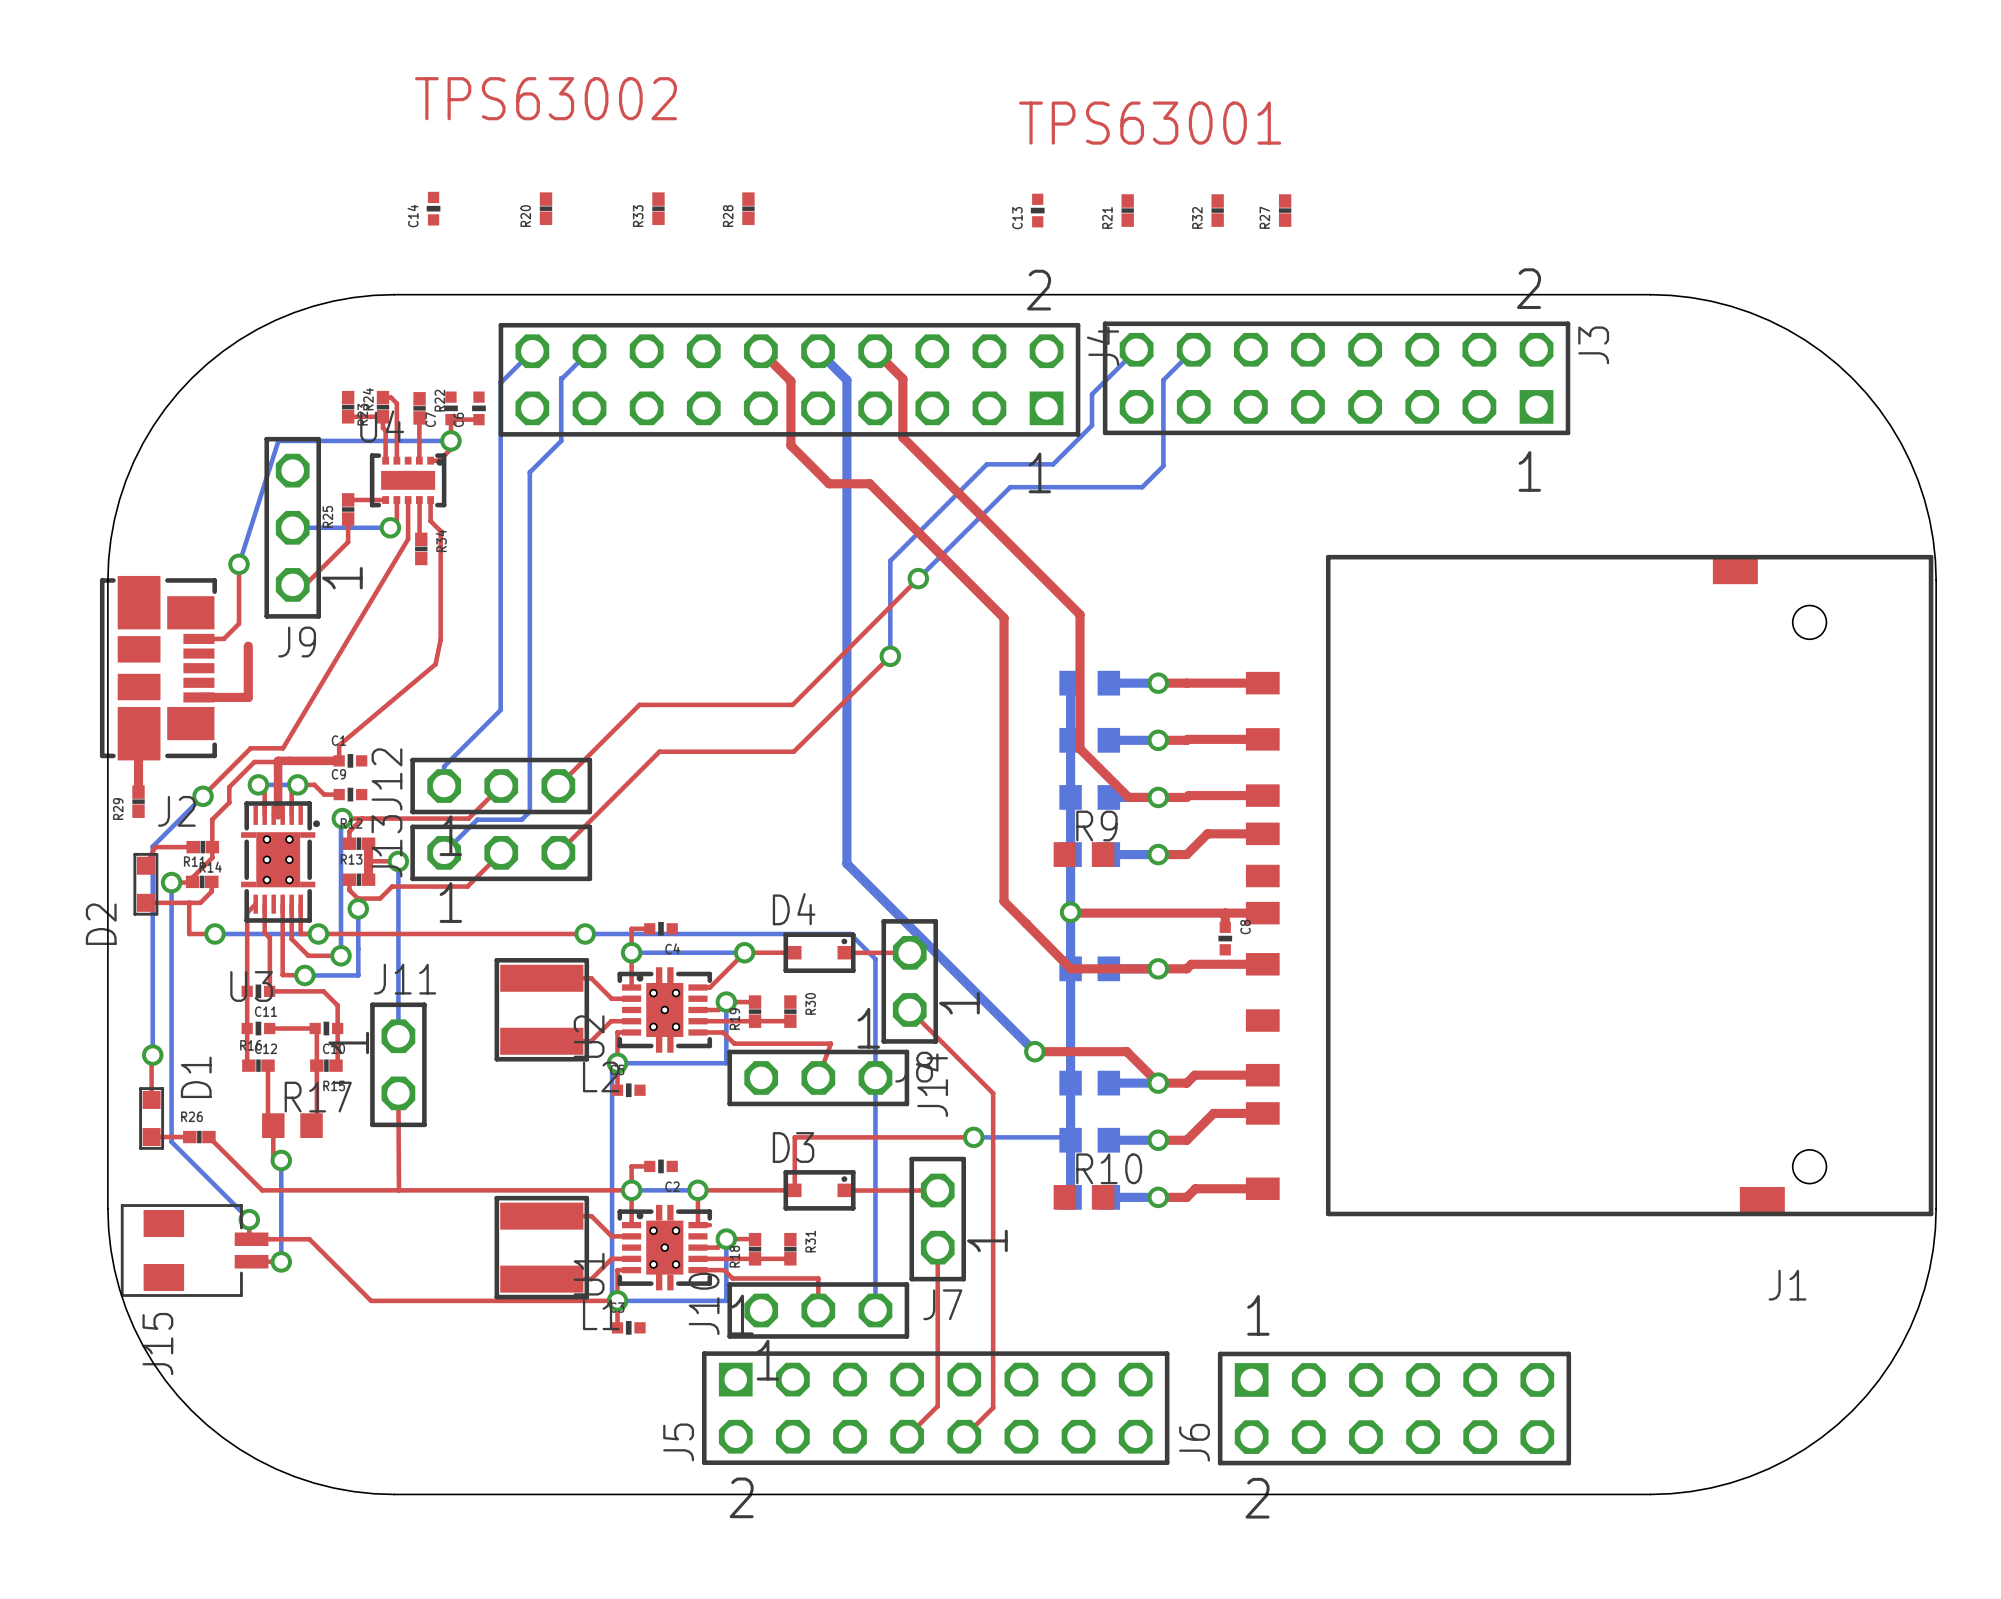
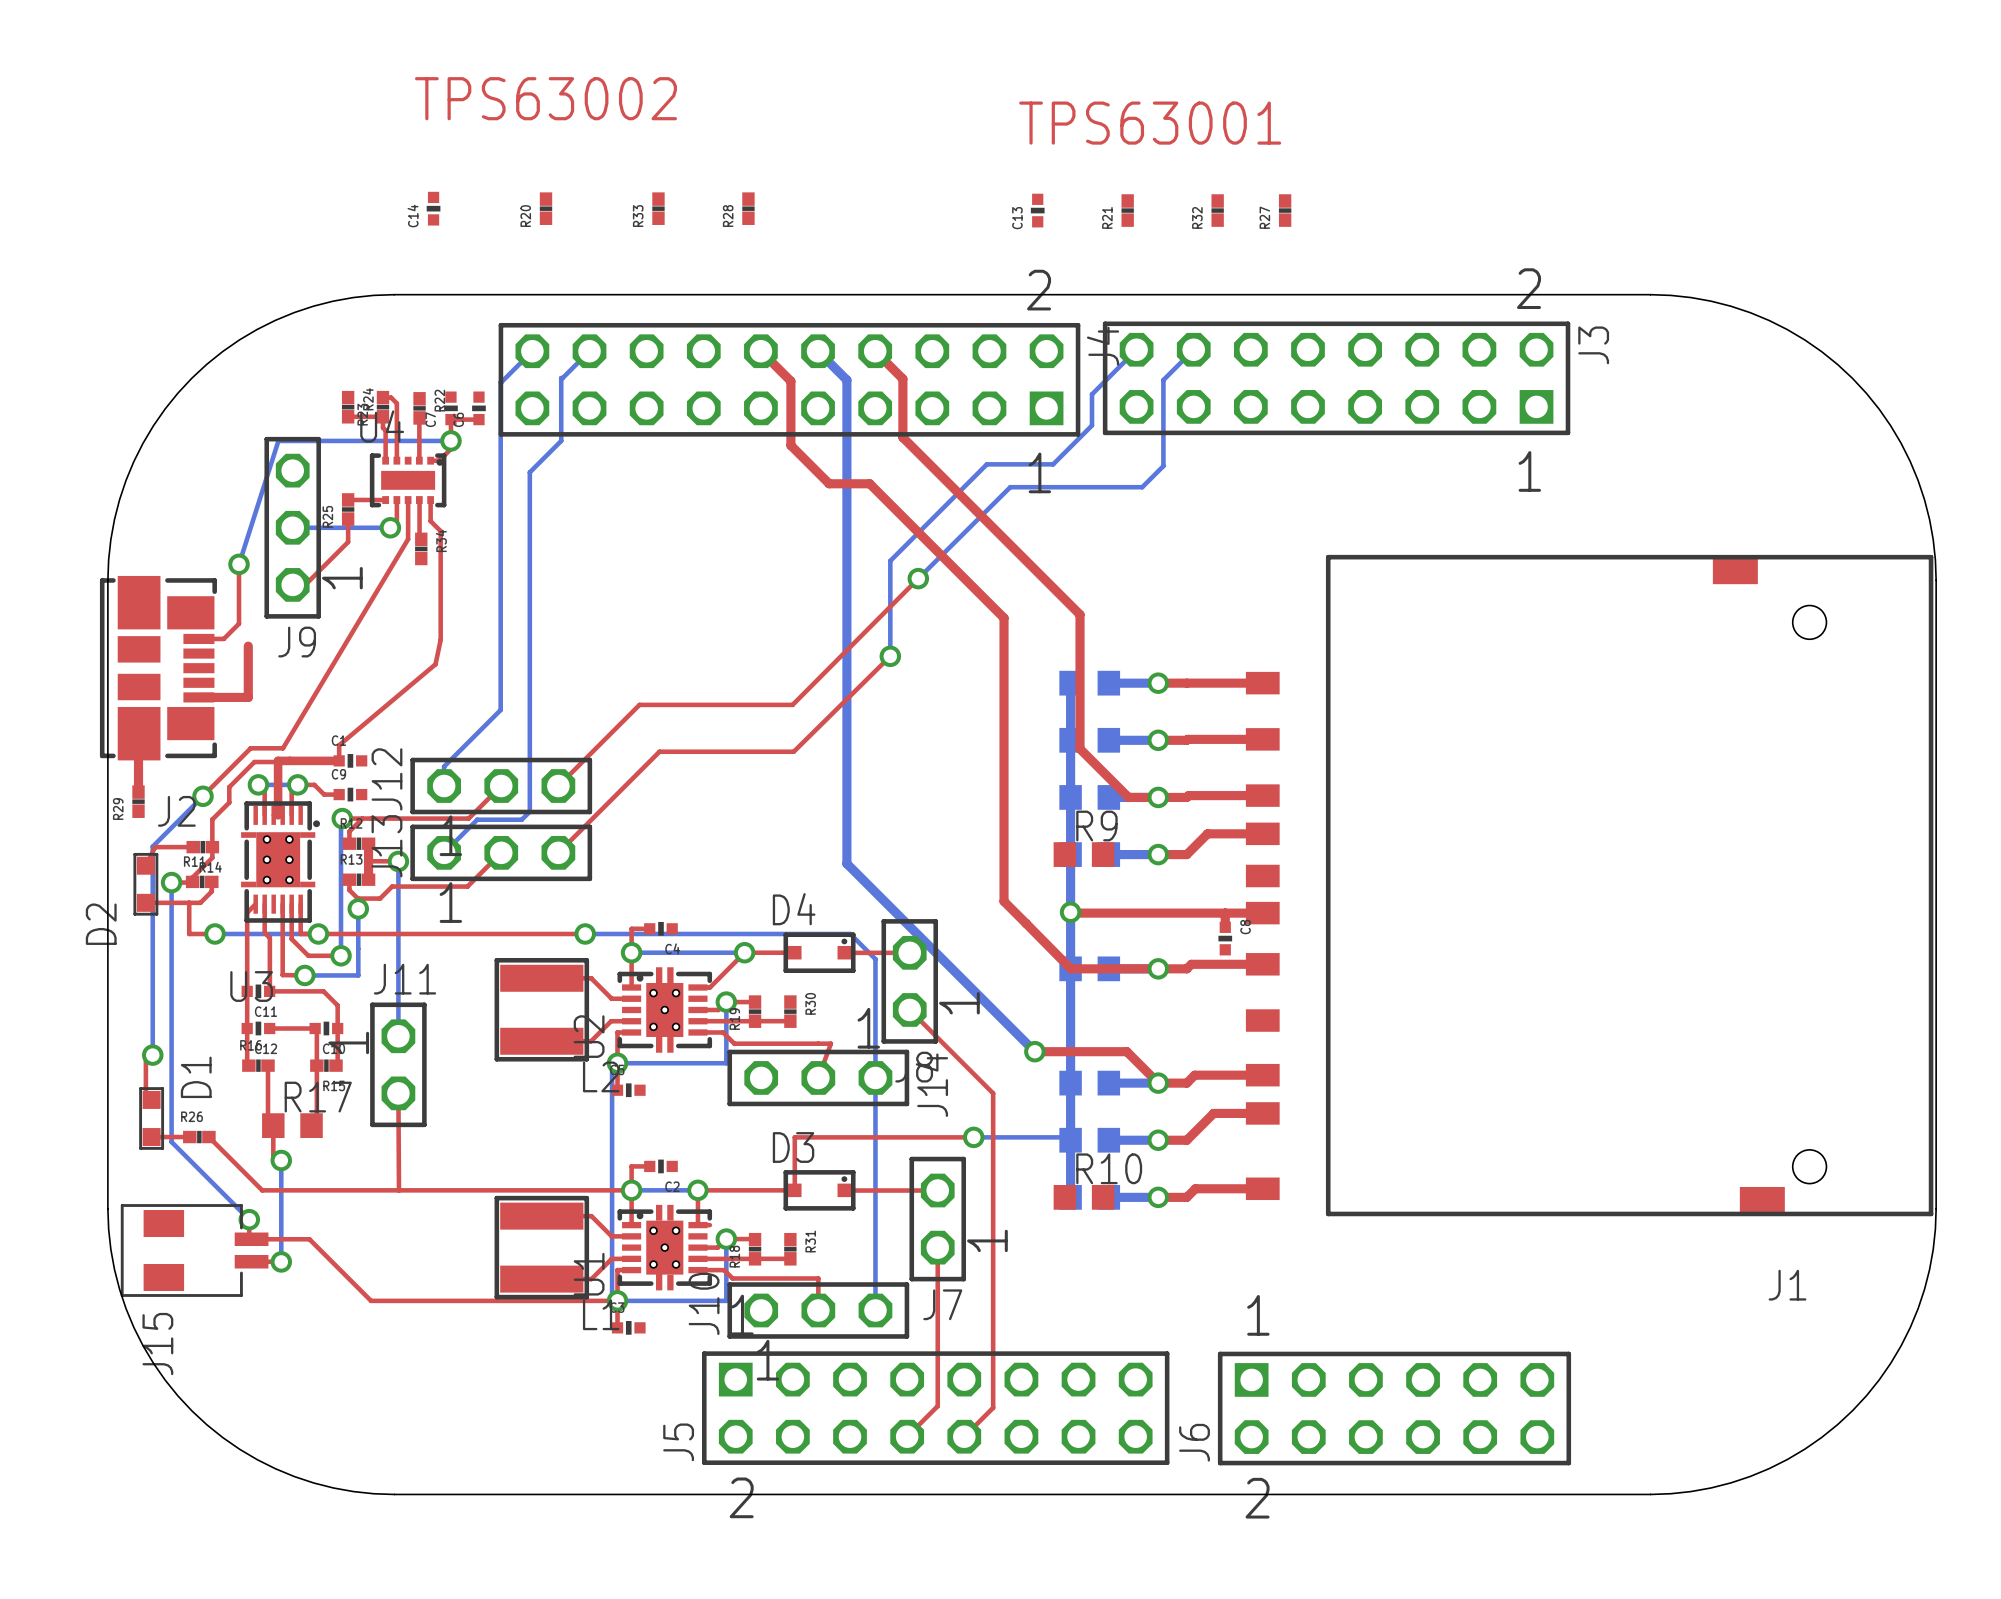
top track: none -> (145, 1055) (145, 1099)
top track: (152, 1055) (151, 1099) -> none

